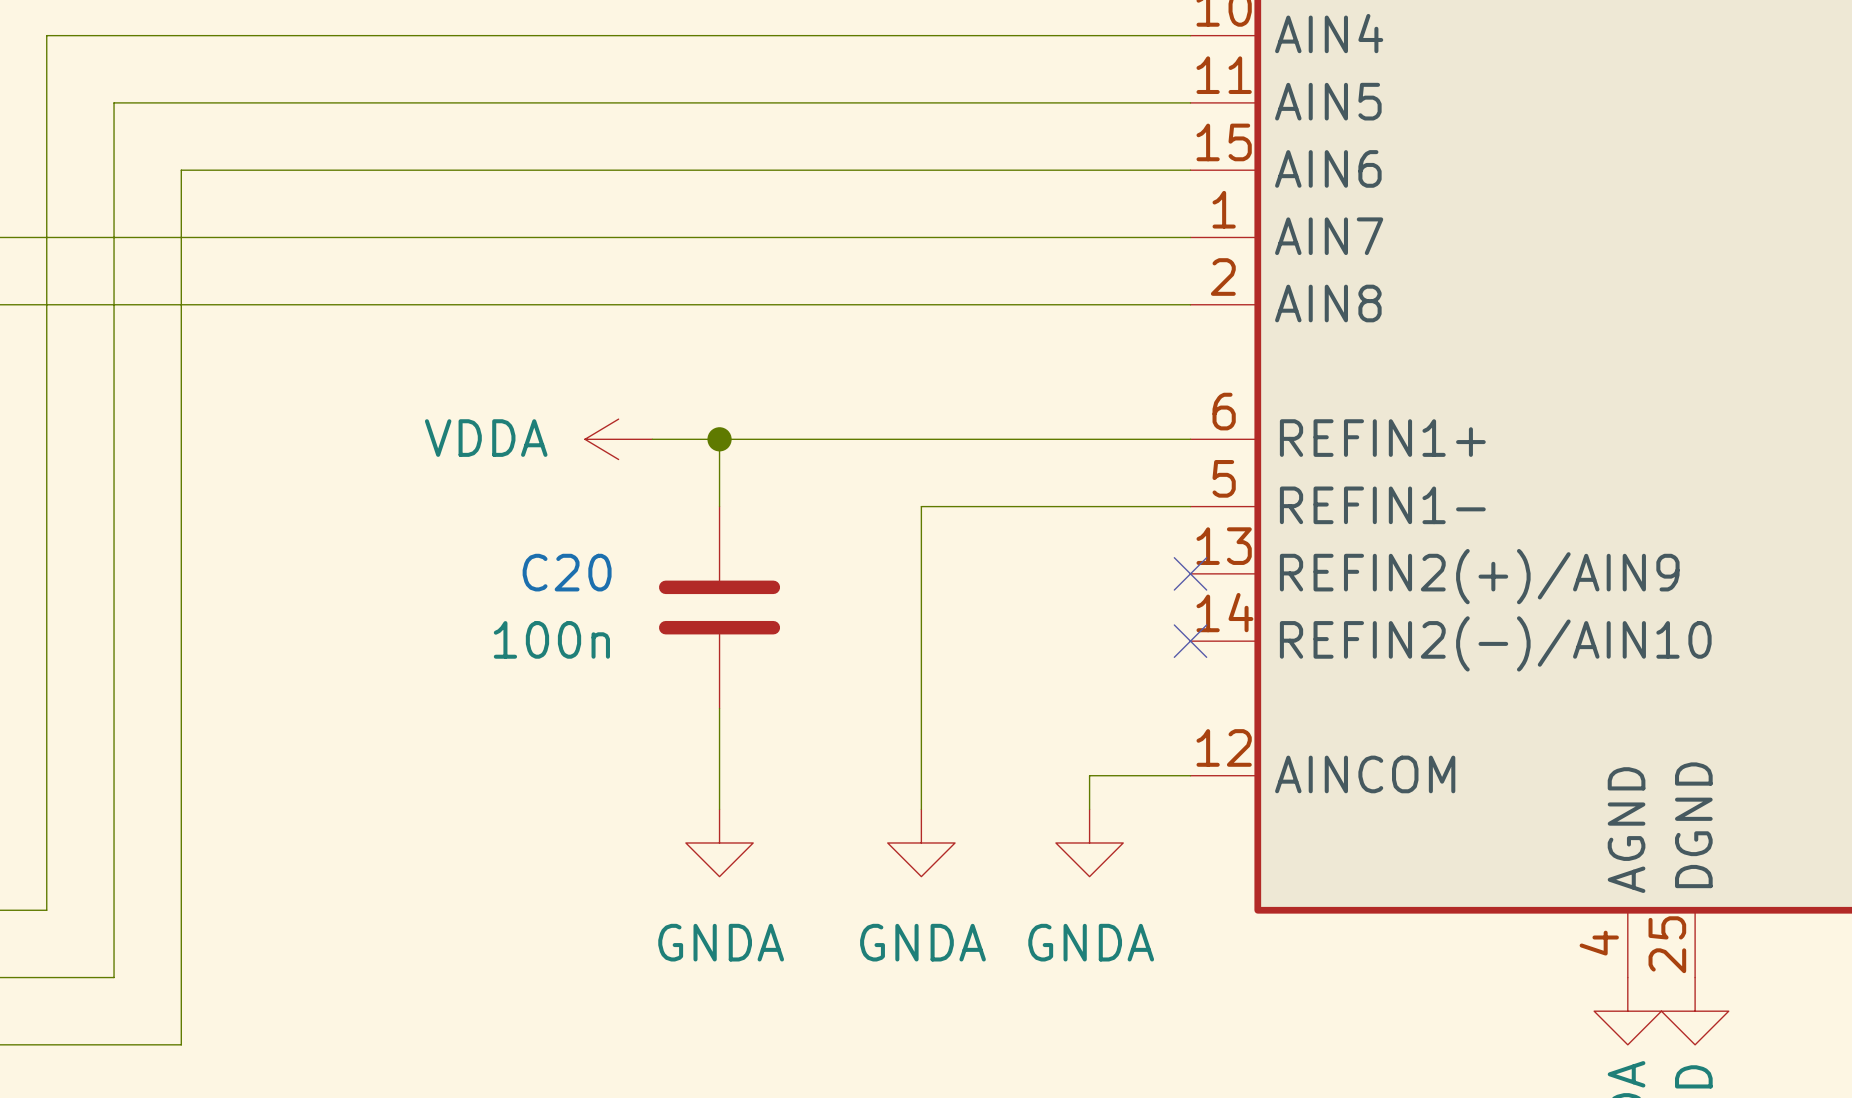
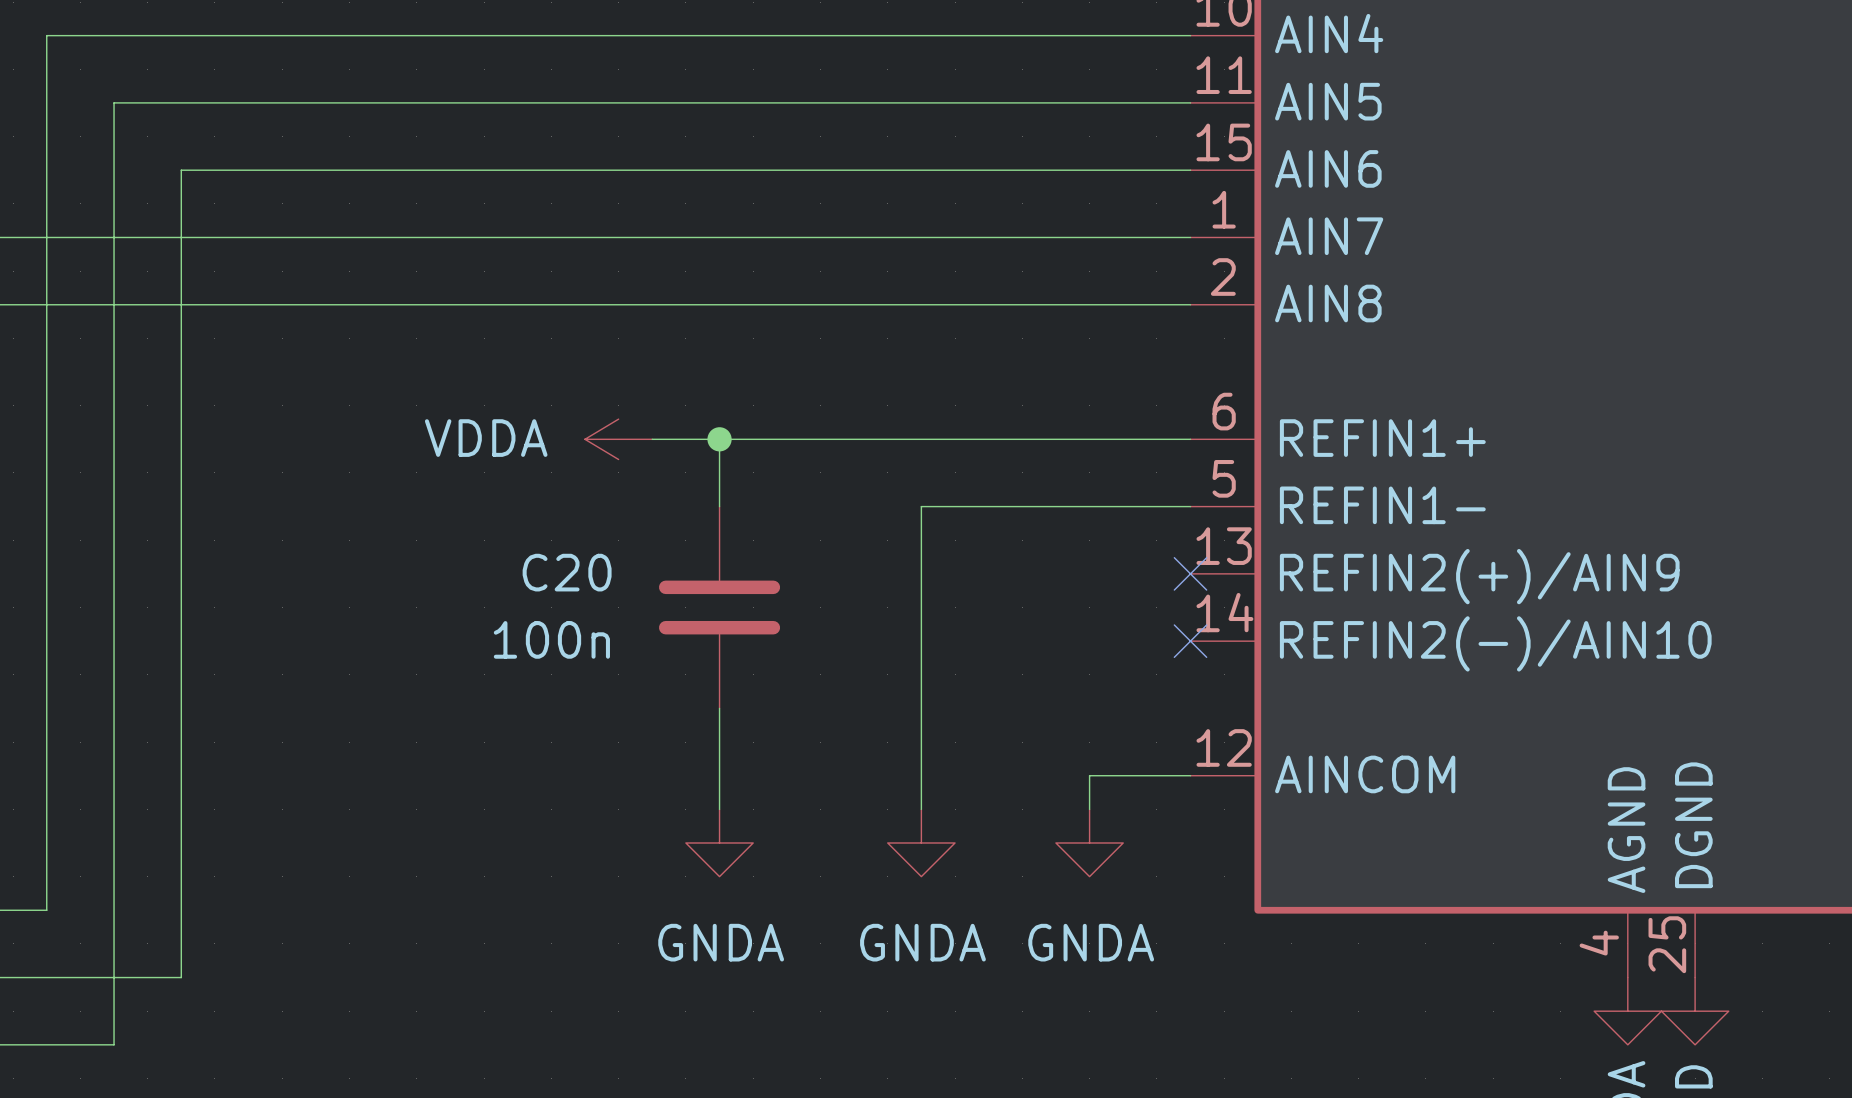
wire: (181, 977) (181, 1044) (114, 1044) -> (181, 977) (114, 977) (114, 1044)

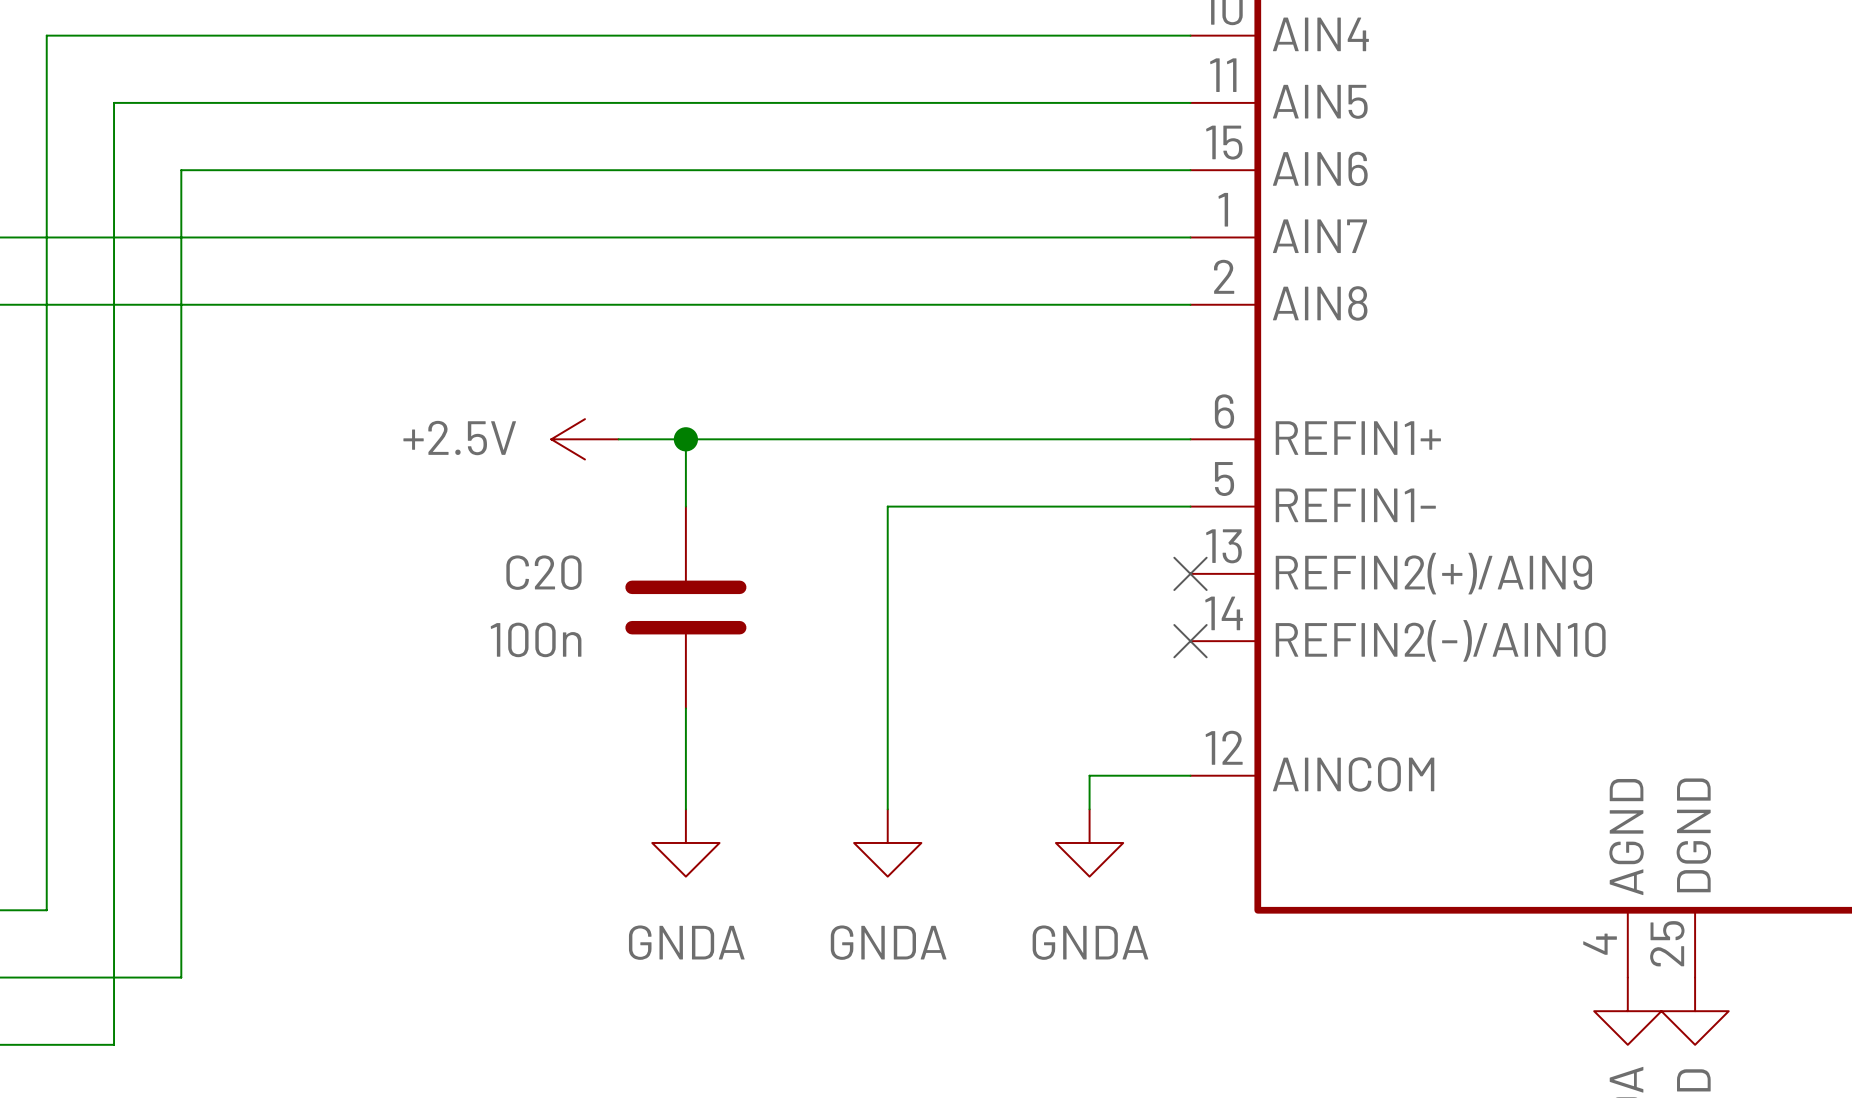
power symbol: none -> +2.5V (584, 439)
power symbol: VDDA (618, 439) -> none
wire: (719, 439) (719, 506) -> (685, 439) (685, 506)
junction position: (719, 439) -> (685, 439)
wire: (921, 506) (921, 809) -> (921, 506) (887, 506) (887, 809)
C20 position: (719, 607) -> (685, 607)
wire: (719, 708) (719, 809) -> (685, 708) (685, 809)
power symbol position: GNDA (719, 842) -> GNDA (685, 842)
power symbol position: GNDA (921, 842) -> GNDA (887, 842)

